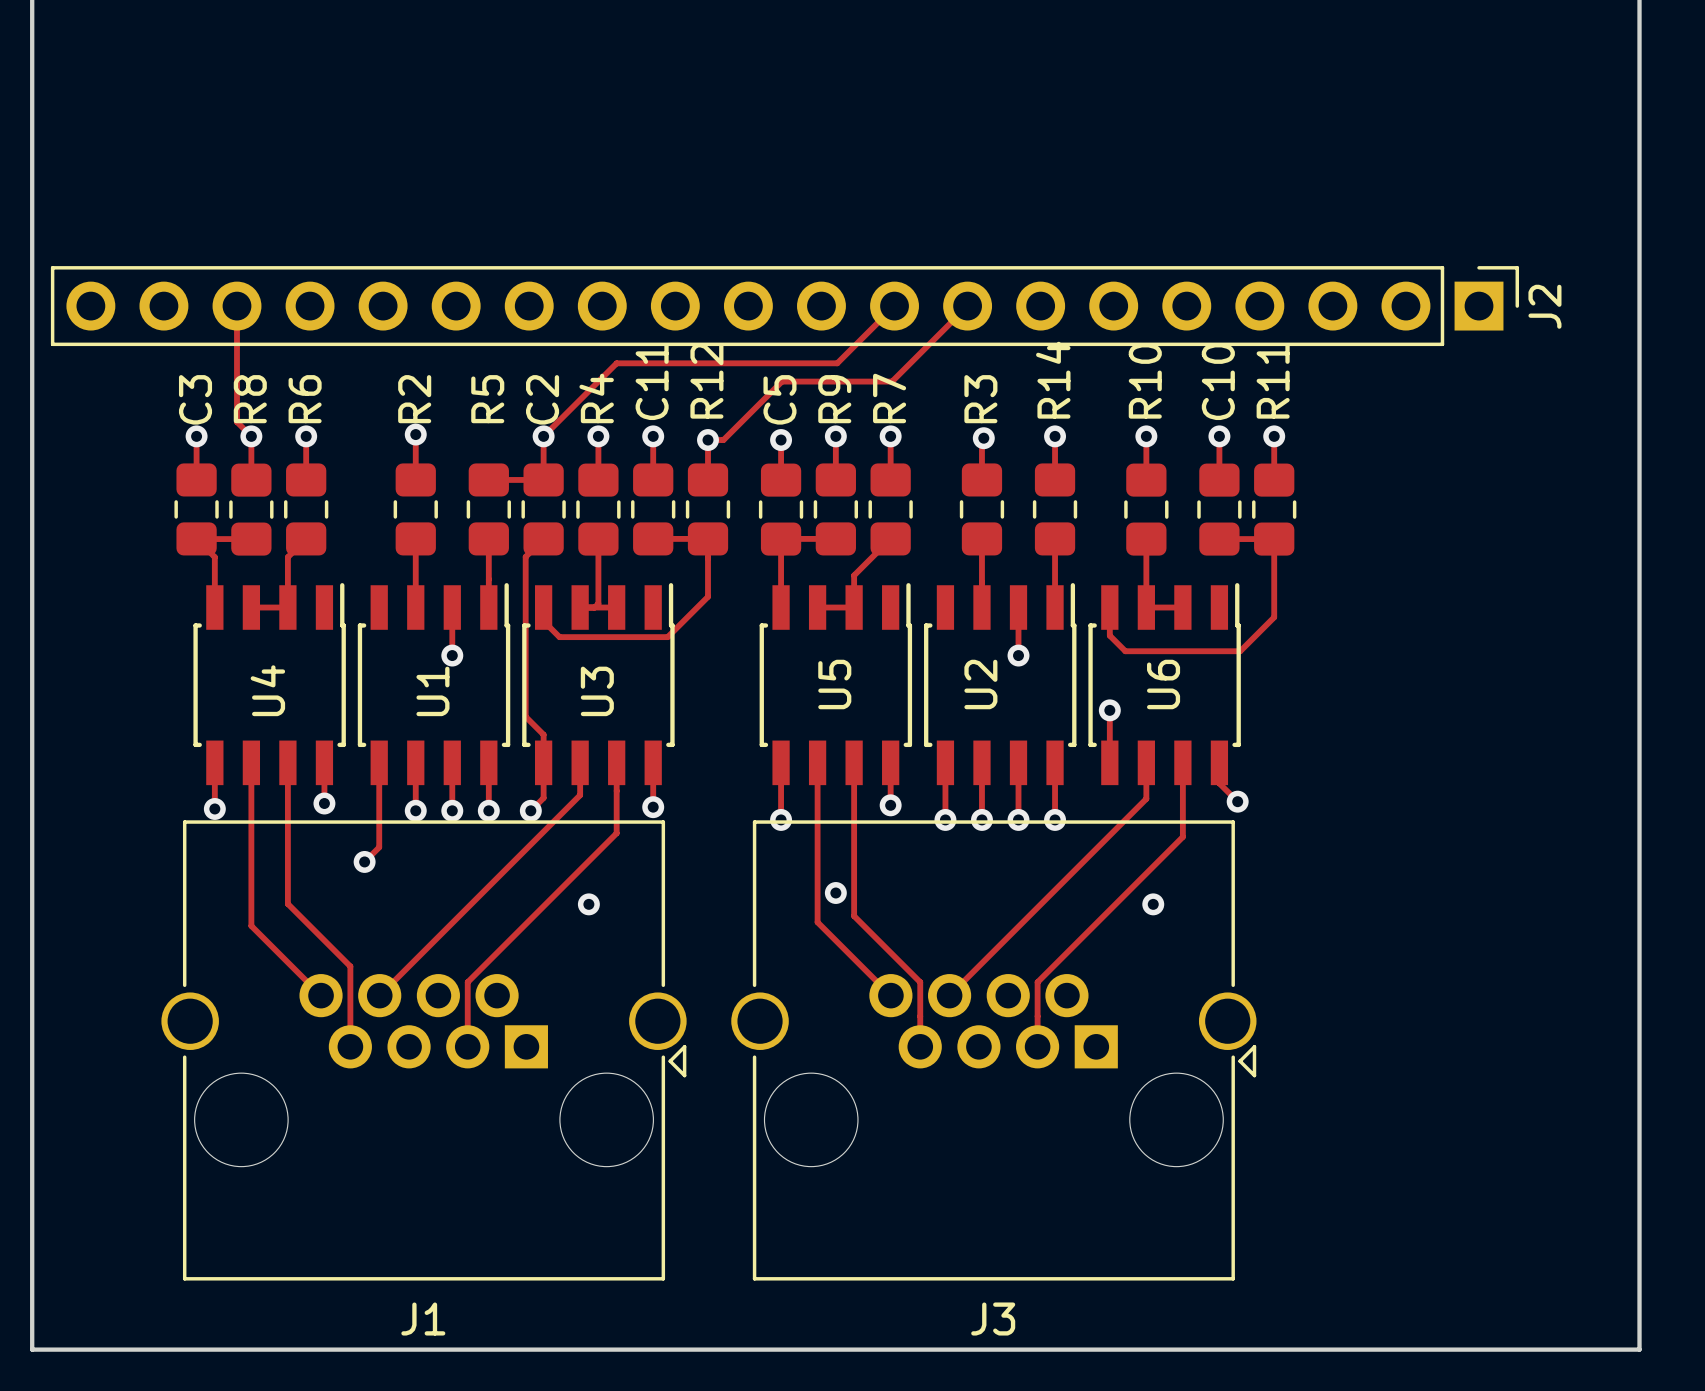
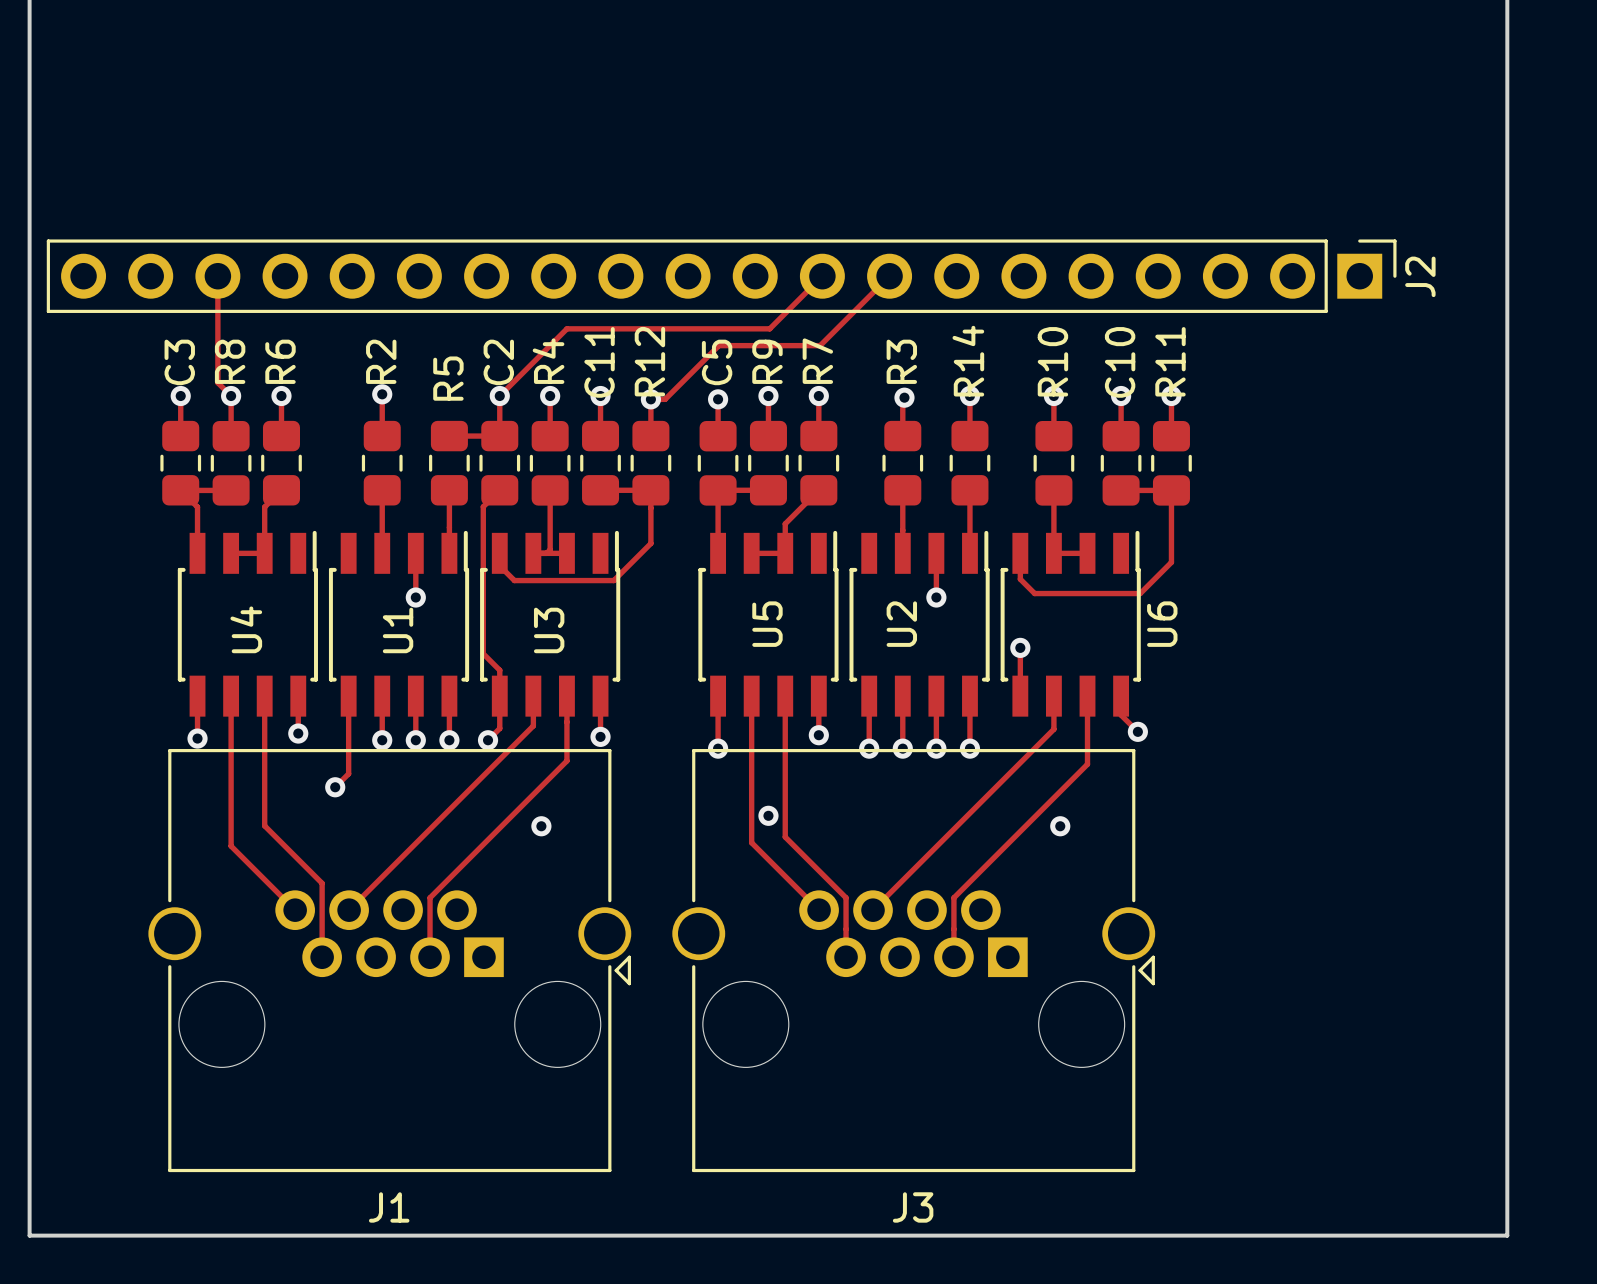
R12 name position: R12 (706, 380) -> R12 (649, 361)
R14 name position: R14 (1053, 380) -> R14 (968, 361)
R10 name position: R10 (1145, 380) -> R10 (1052, 361)
R11 name position: R11 (1273, 380) -> R11 (1170, 361)
C11 name position: C11 (652, 381) -> C11 (599, 362)
C10 name position: C10 (1218, 381) -> C10 (1120, 362)
R5 name position: R5 (487, 399) -> R5 (448, 378)
U6 name position: U6 (1163, 684) -> U6 (1162, 624)

